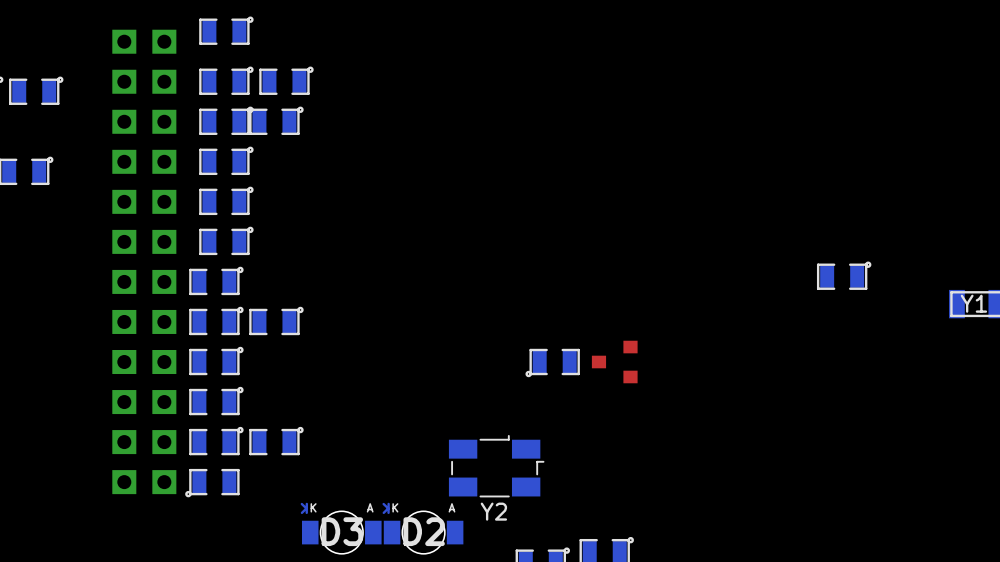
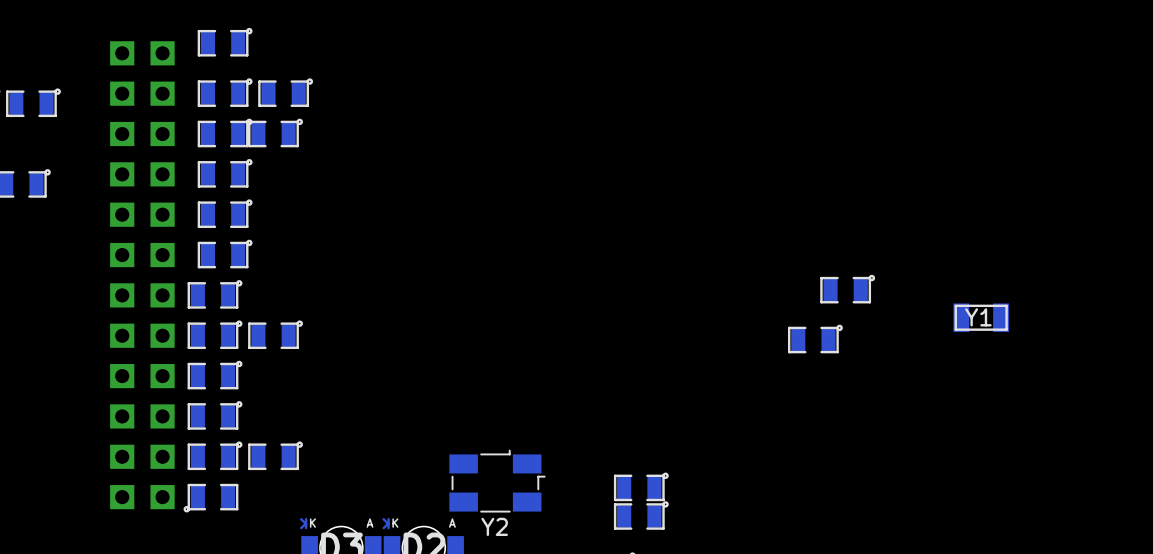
part: none -> (815, 339)
part: (614, 362) -> none
part: (552, 363) -> none
part: none -> (641, 486)
part: none -> (641, 515)

